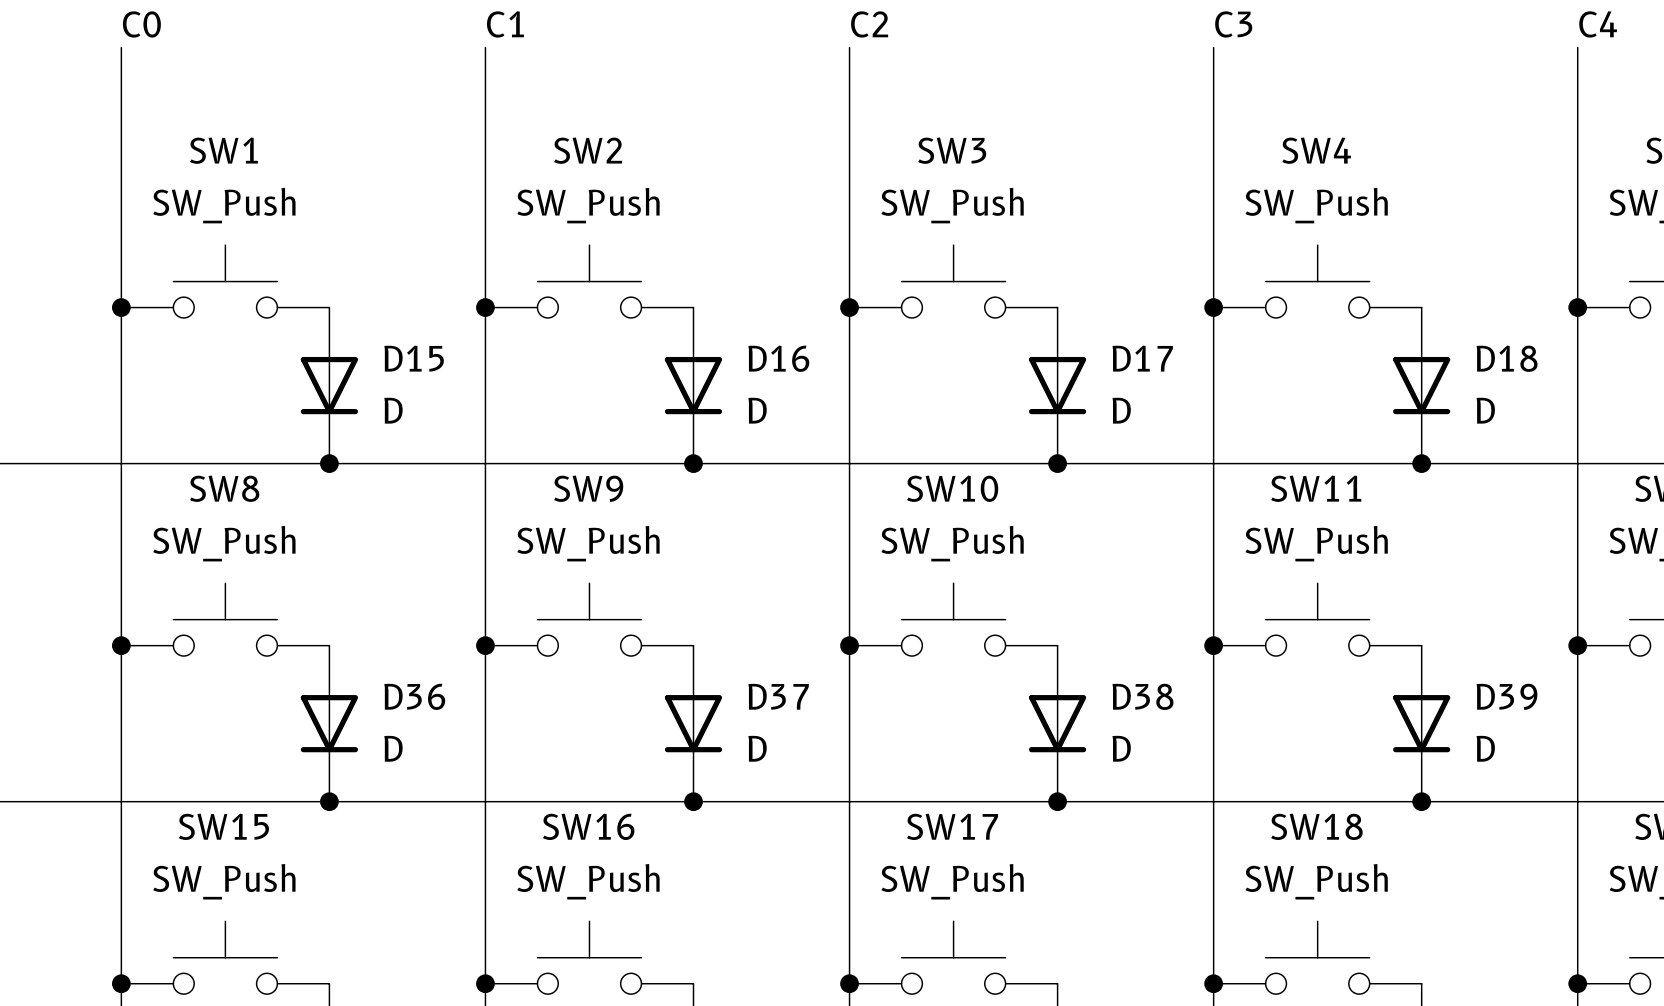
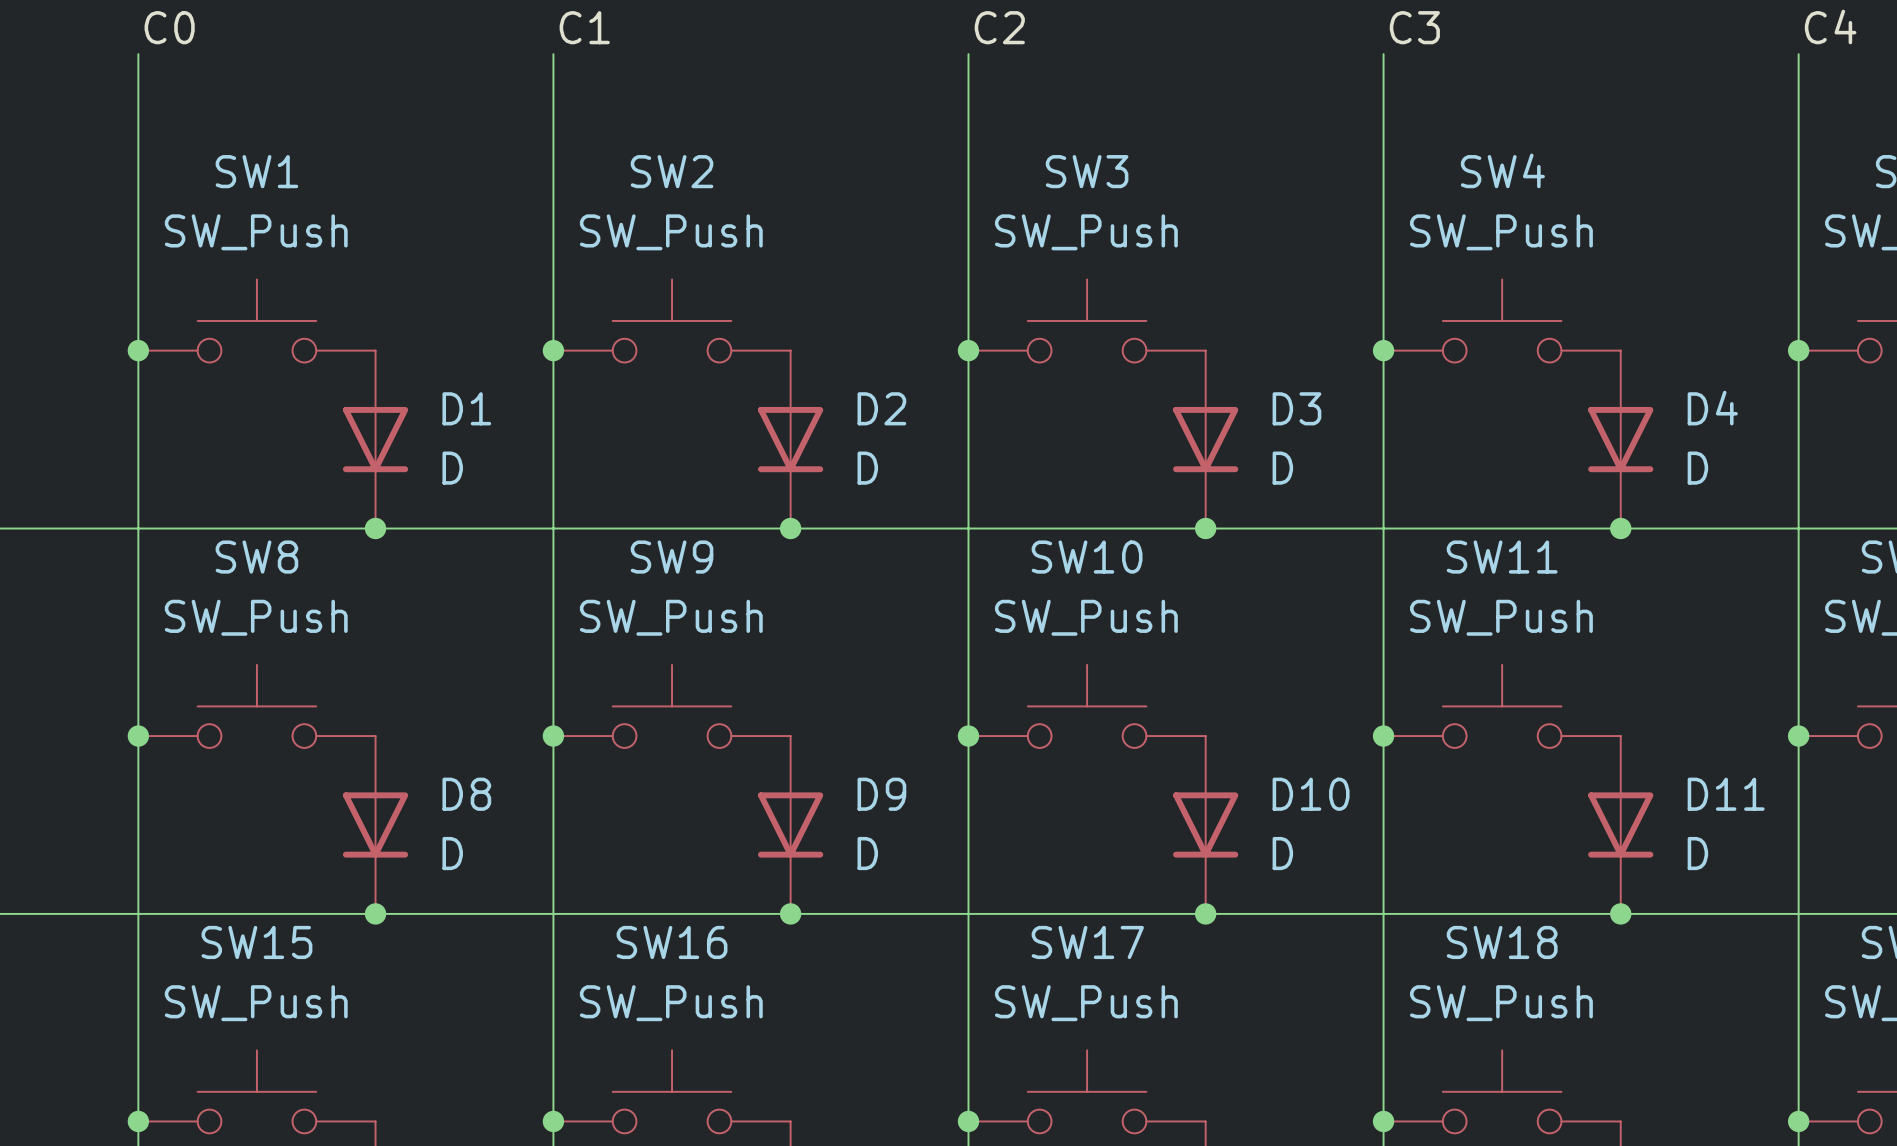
D15 name: D15 (414, 358) -> D1 (466, 408)
D16 name: D16 (778, 358) -> D2 (881, 408)
D17 name: D17 (1142, 358) -> D3 (1296, 408)
D18 name: D18 (1507, 358) -> D4 (1712, 408)
D36 name: D36 (414, 696) -> D8 (466, 794)
D37 name: D37 (778, 696) -> D9 (881, 794)
D38 name: D38 (1142, 696) -> D10 (1311, 794)
D39 name: D39 (1506, 696) -> D11 (1726, 794)

